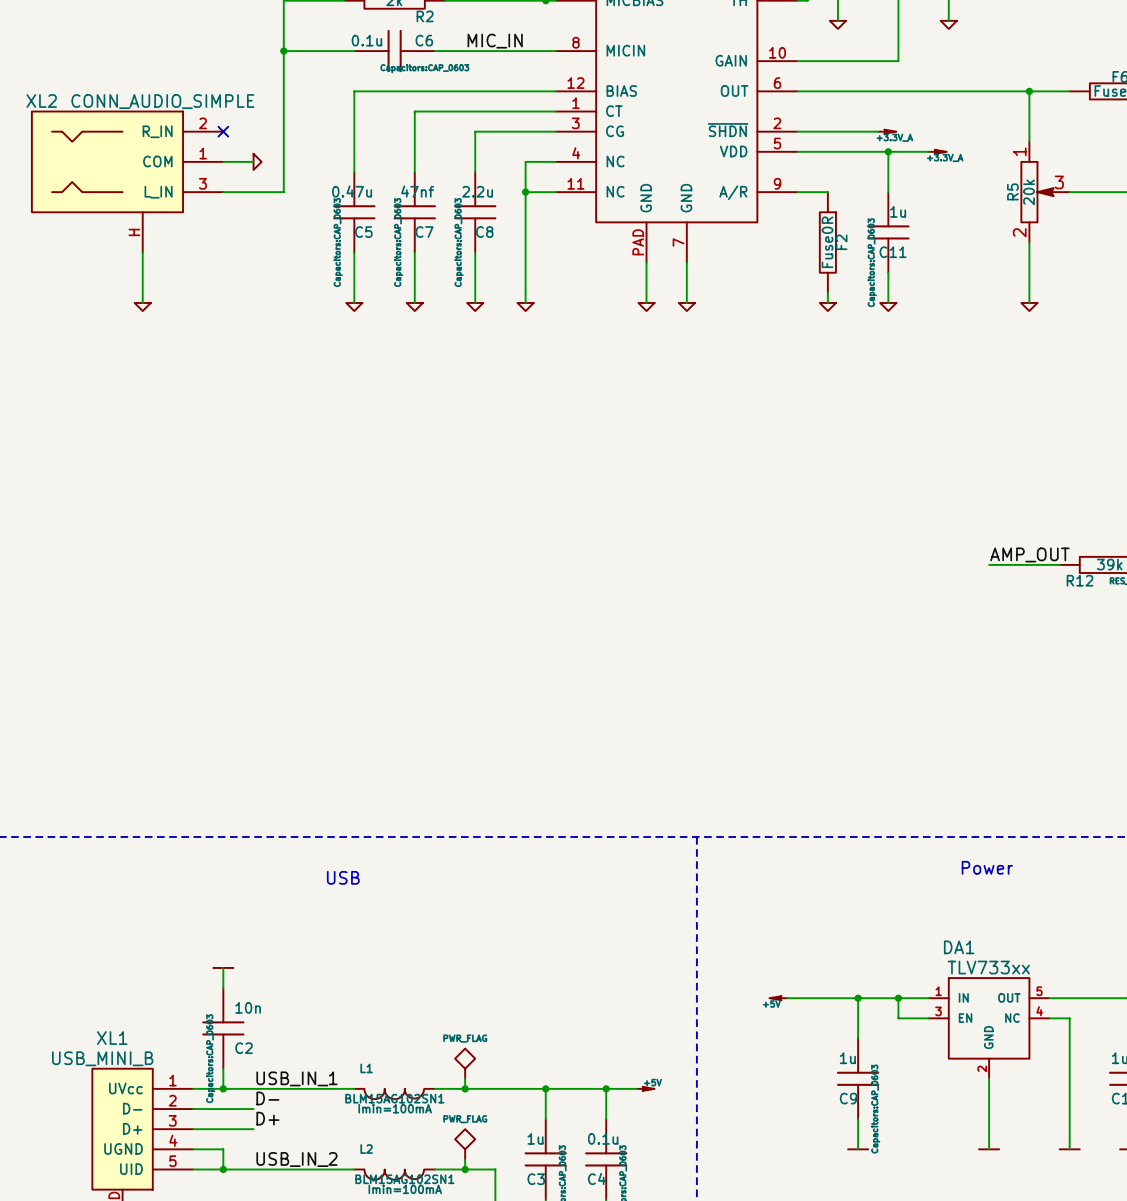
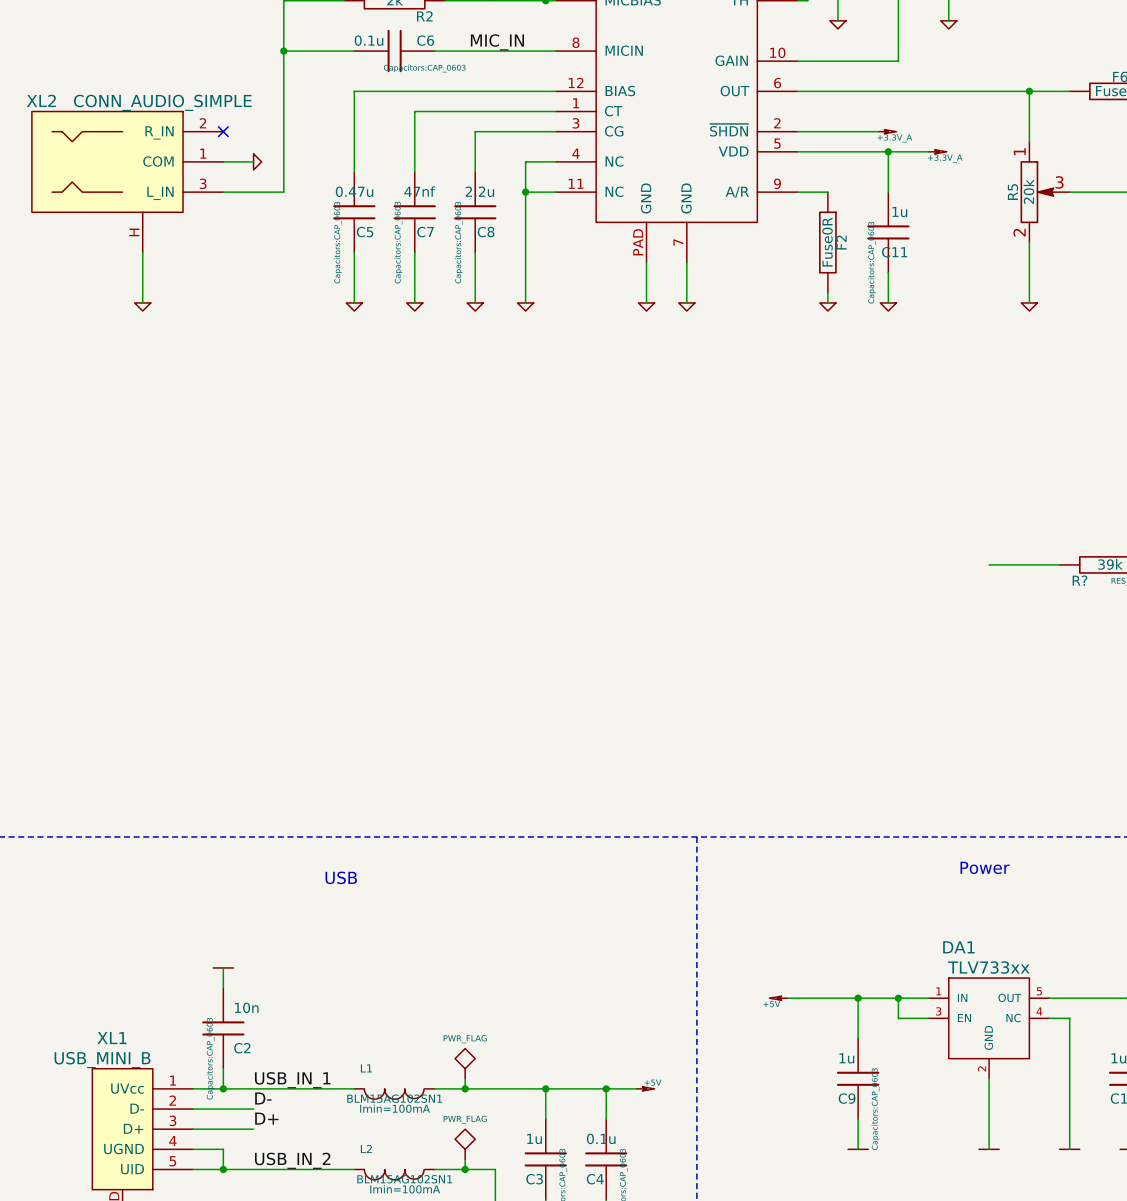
label: AMP_OUT (1029, 554) -> none
R12 name: R12 (1080, 580) -> R? (1079, 580)

